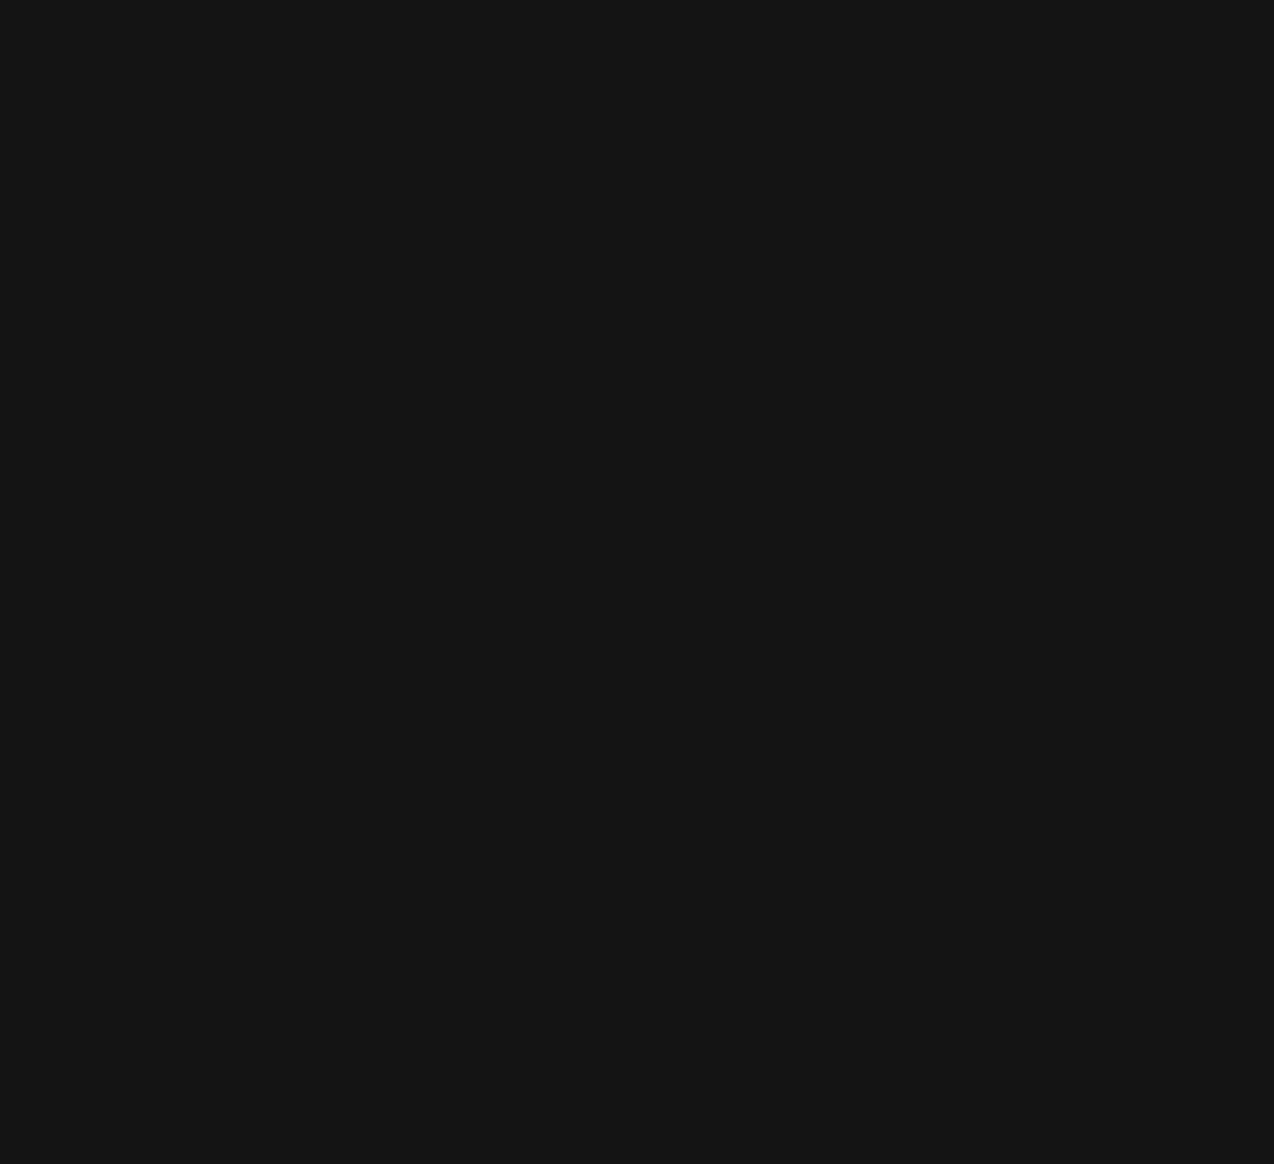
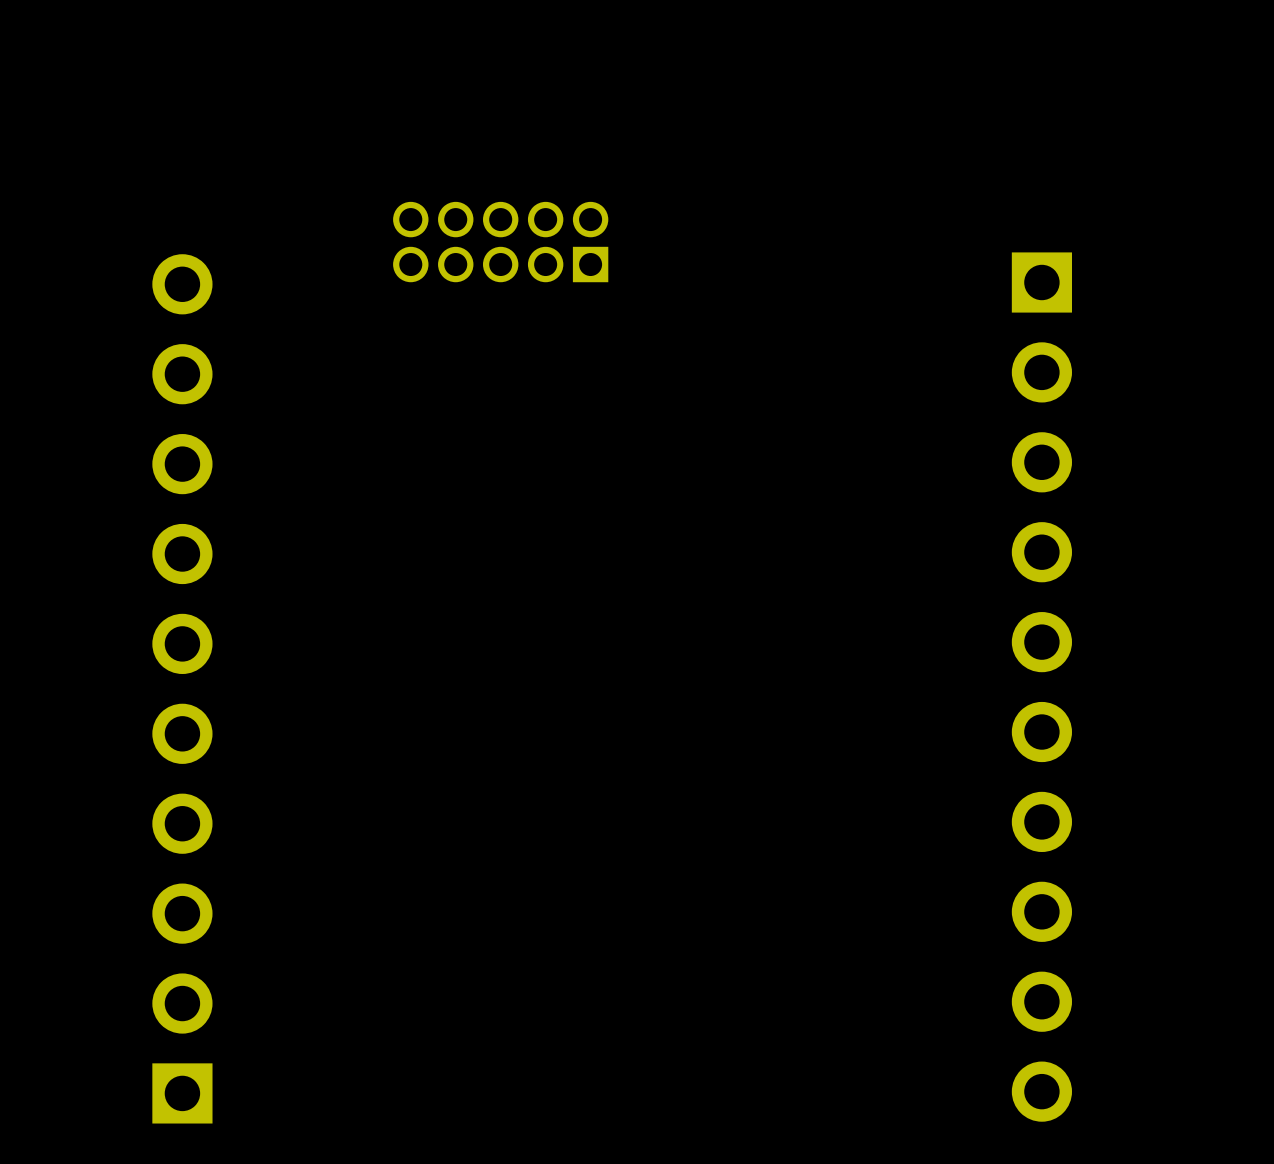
part: none -> (500, 242)
part: none -> (1041, 687)
part: none -> (182, 688)

